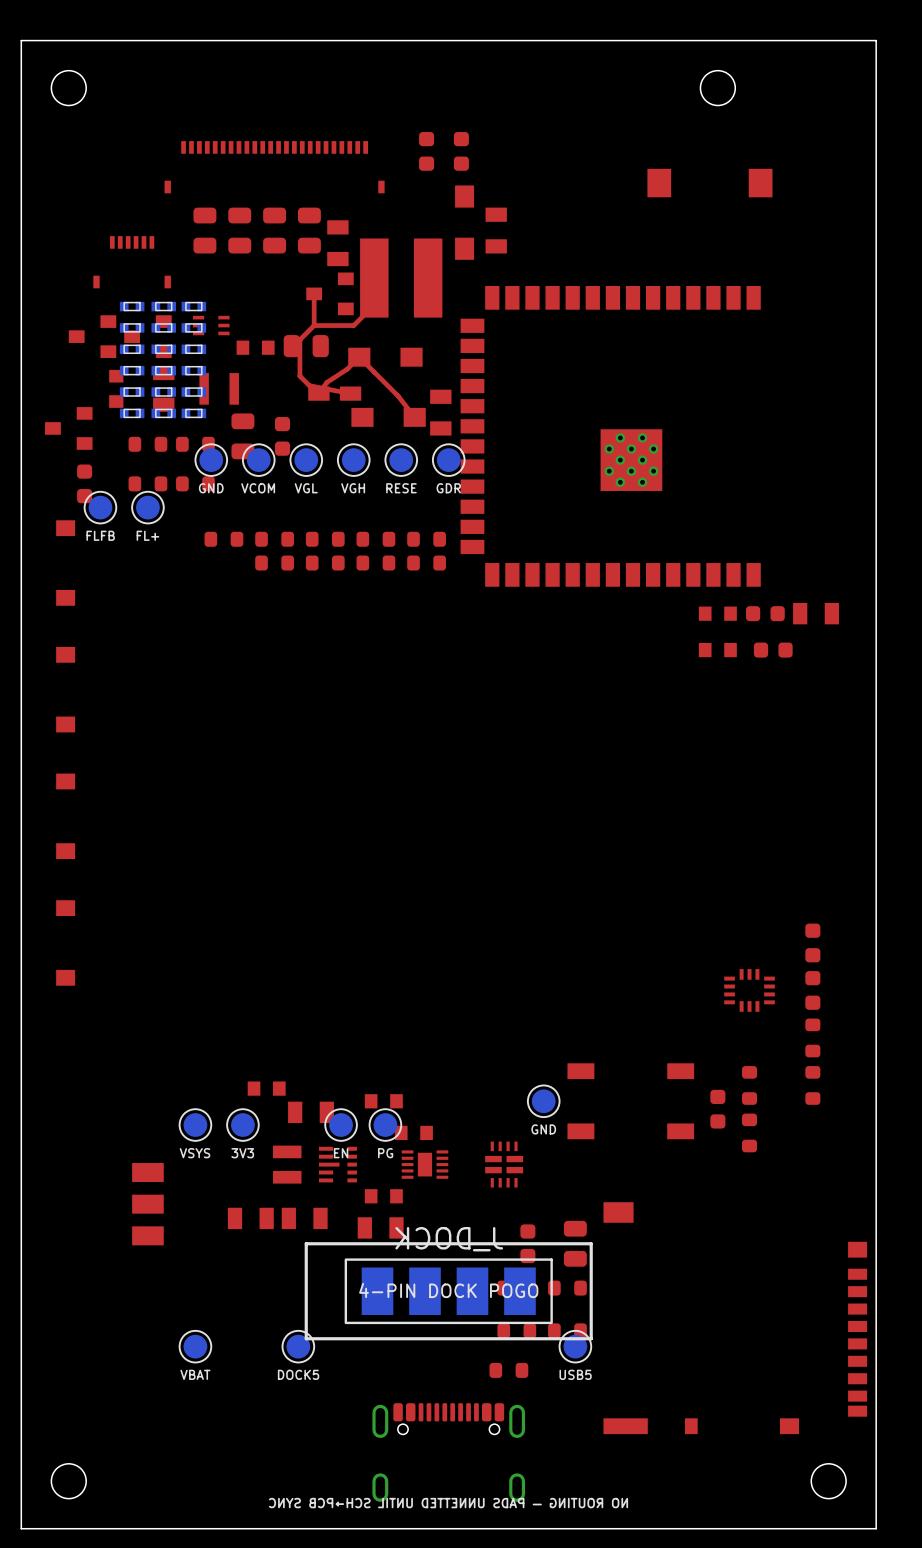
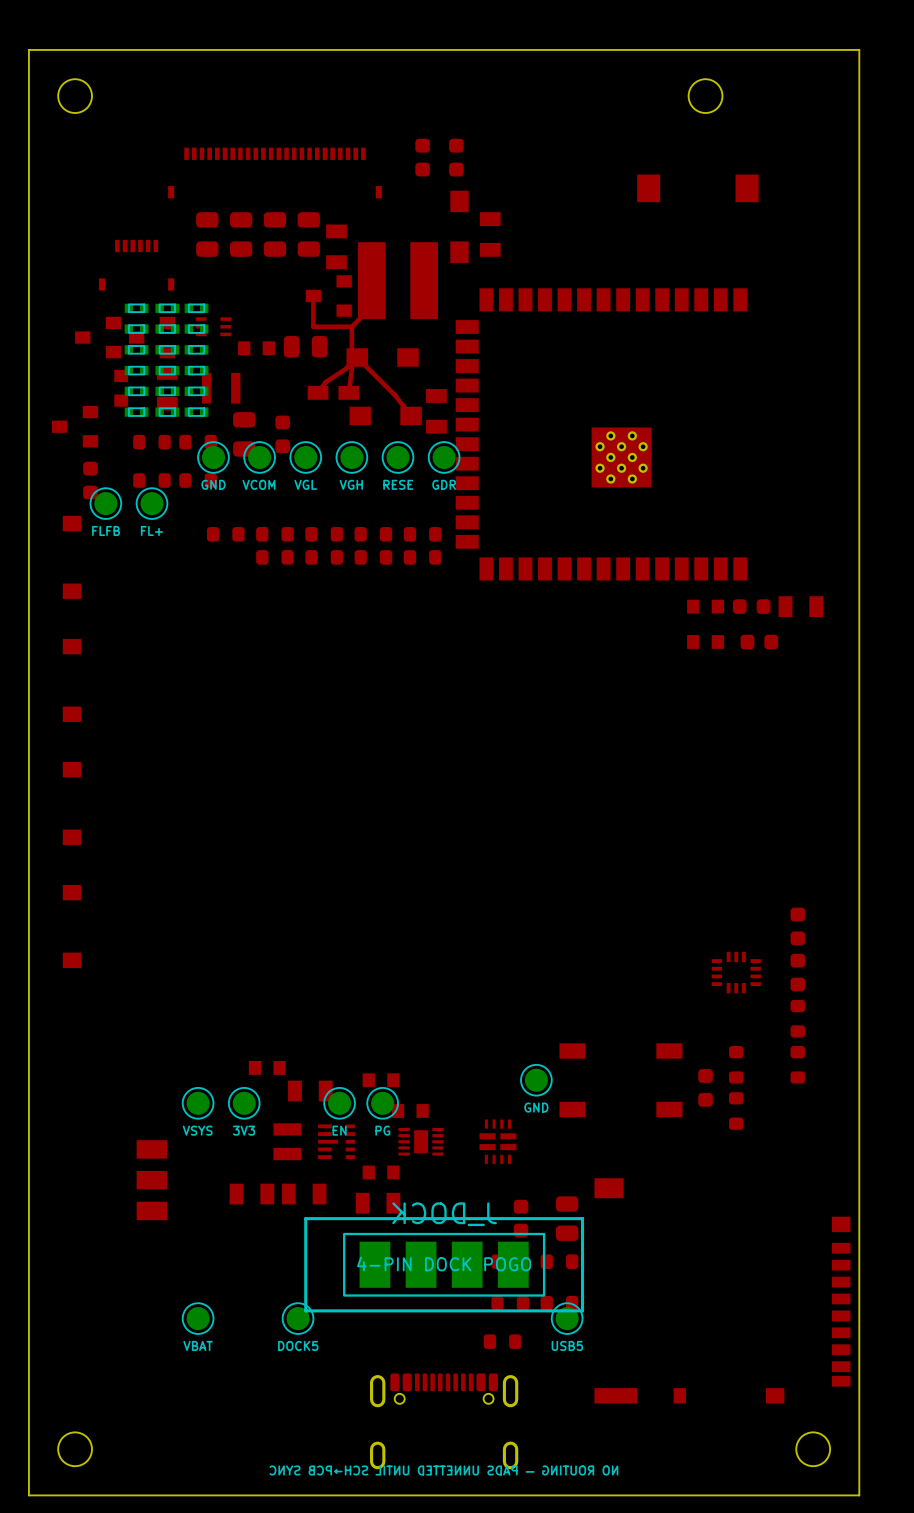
top track: (314, 325) (299, 339) (299, 376) (309, 385) (350, 393) -> (351, 326) (351, 369) (348, 392)

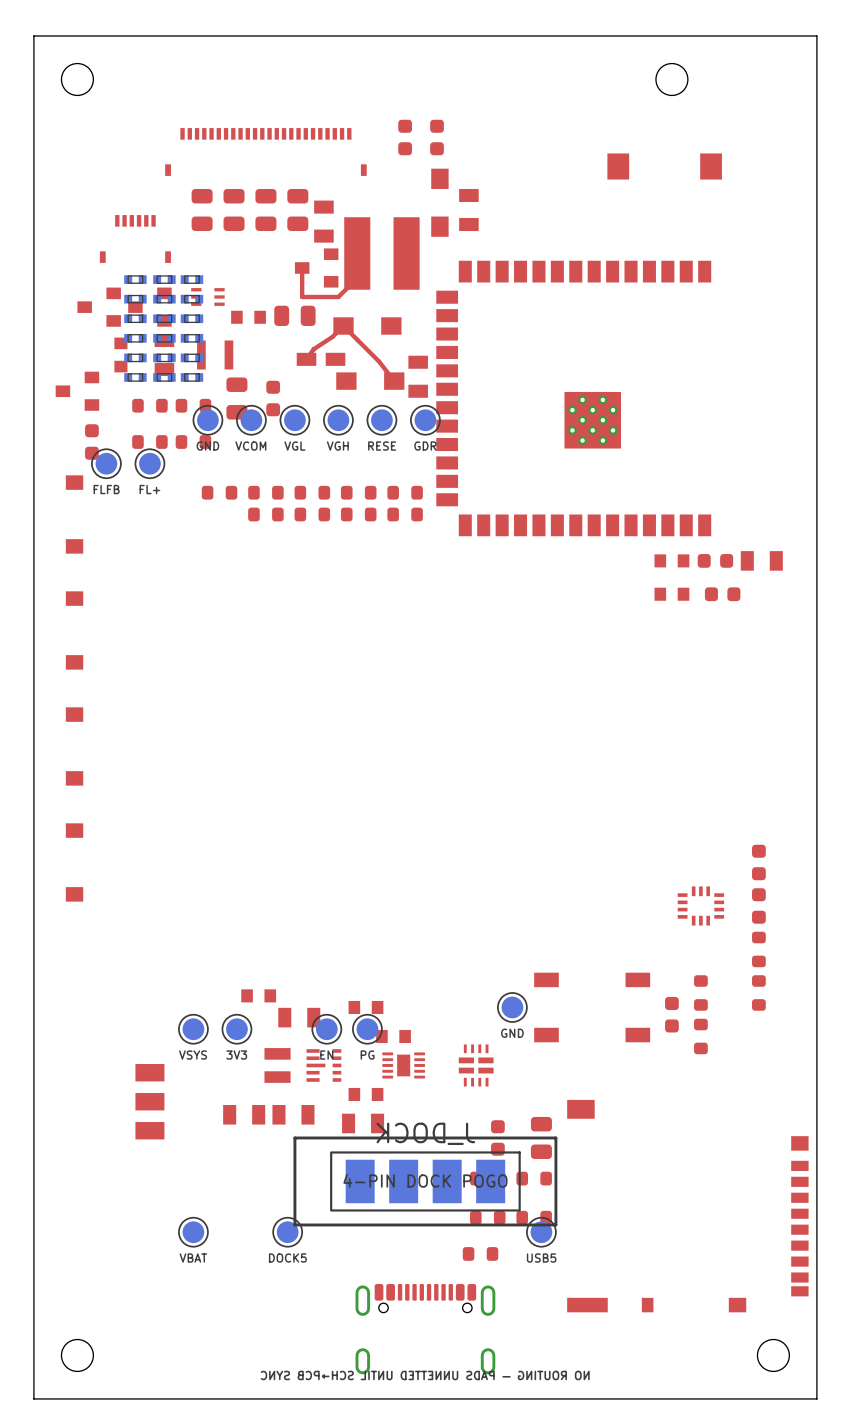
top track: (351, 326) (351, 369) (348, 392) -> none

